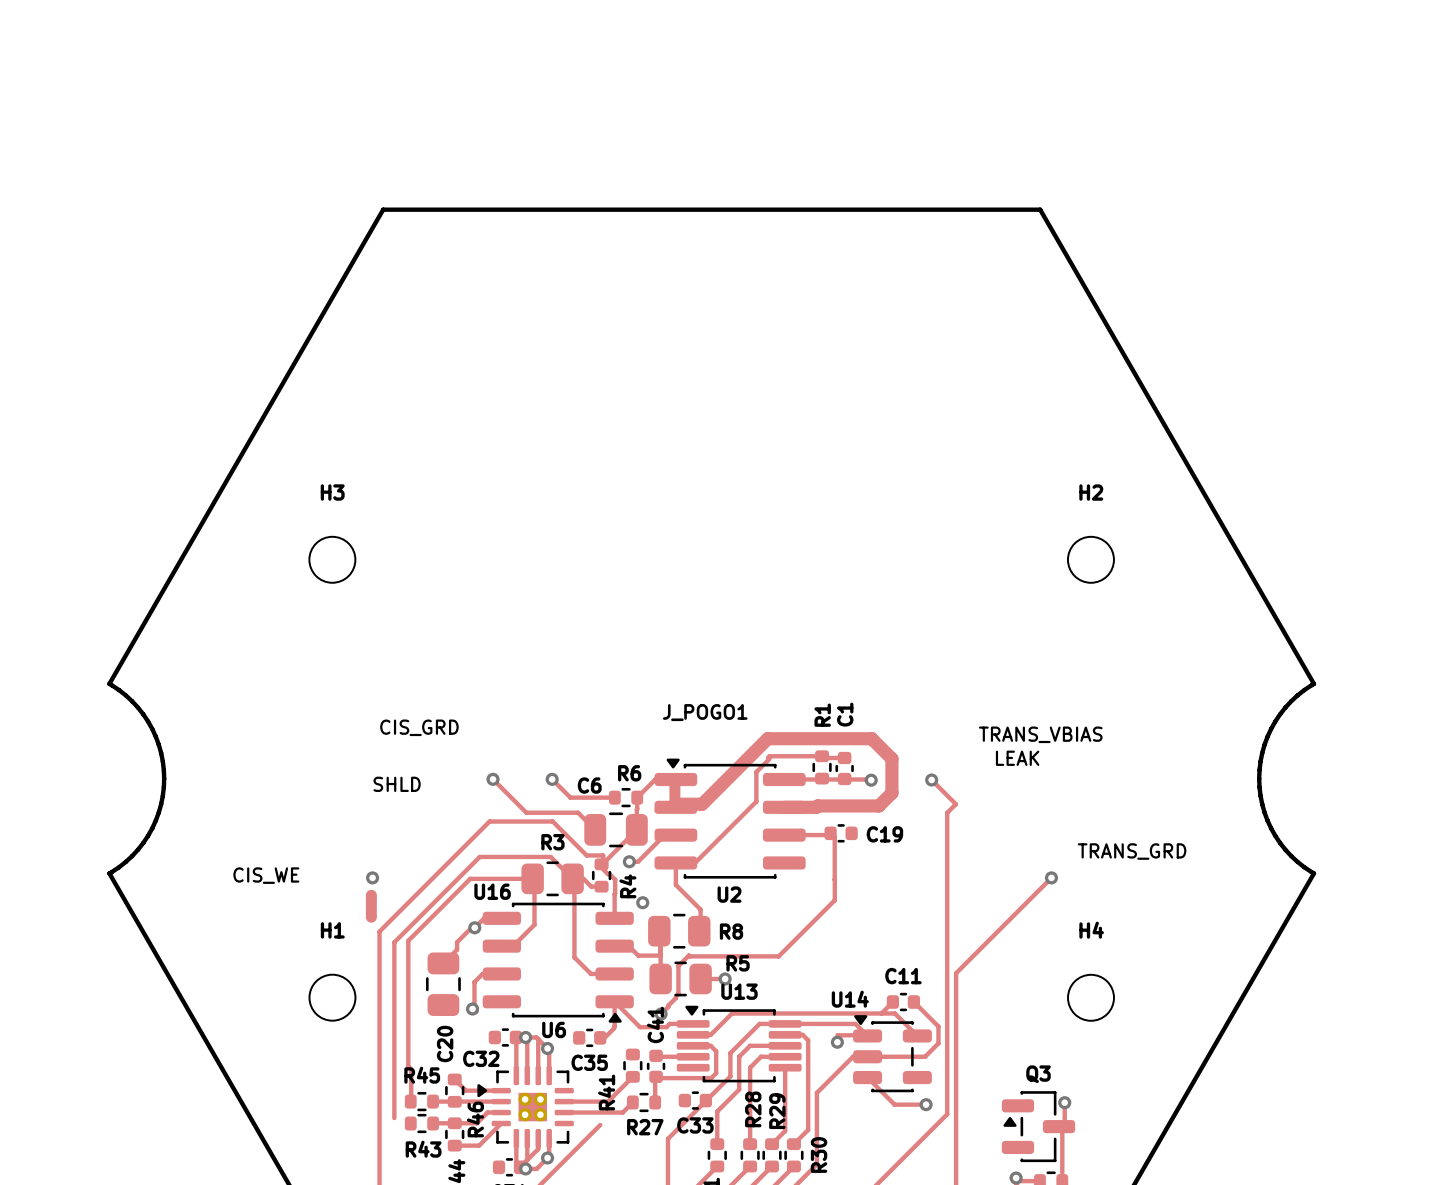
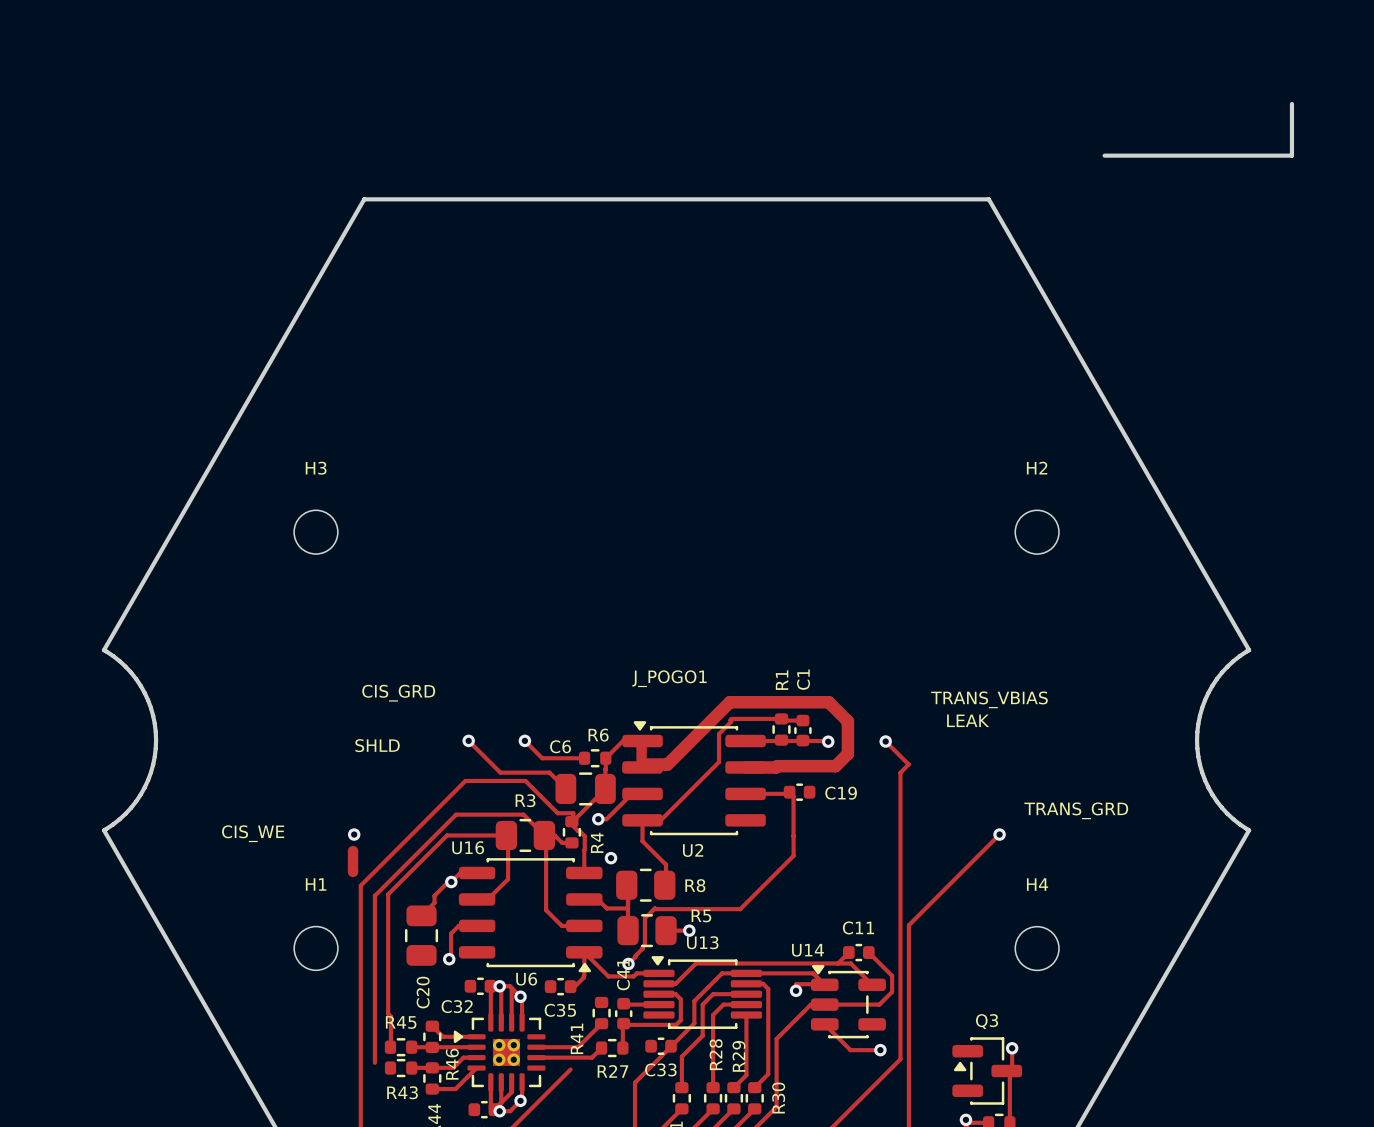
board edge: none -> (1291, 104) (1291, 155) (1104, 155)

